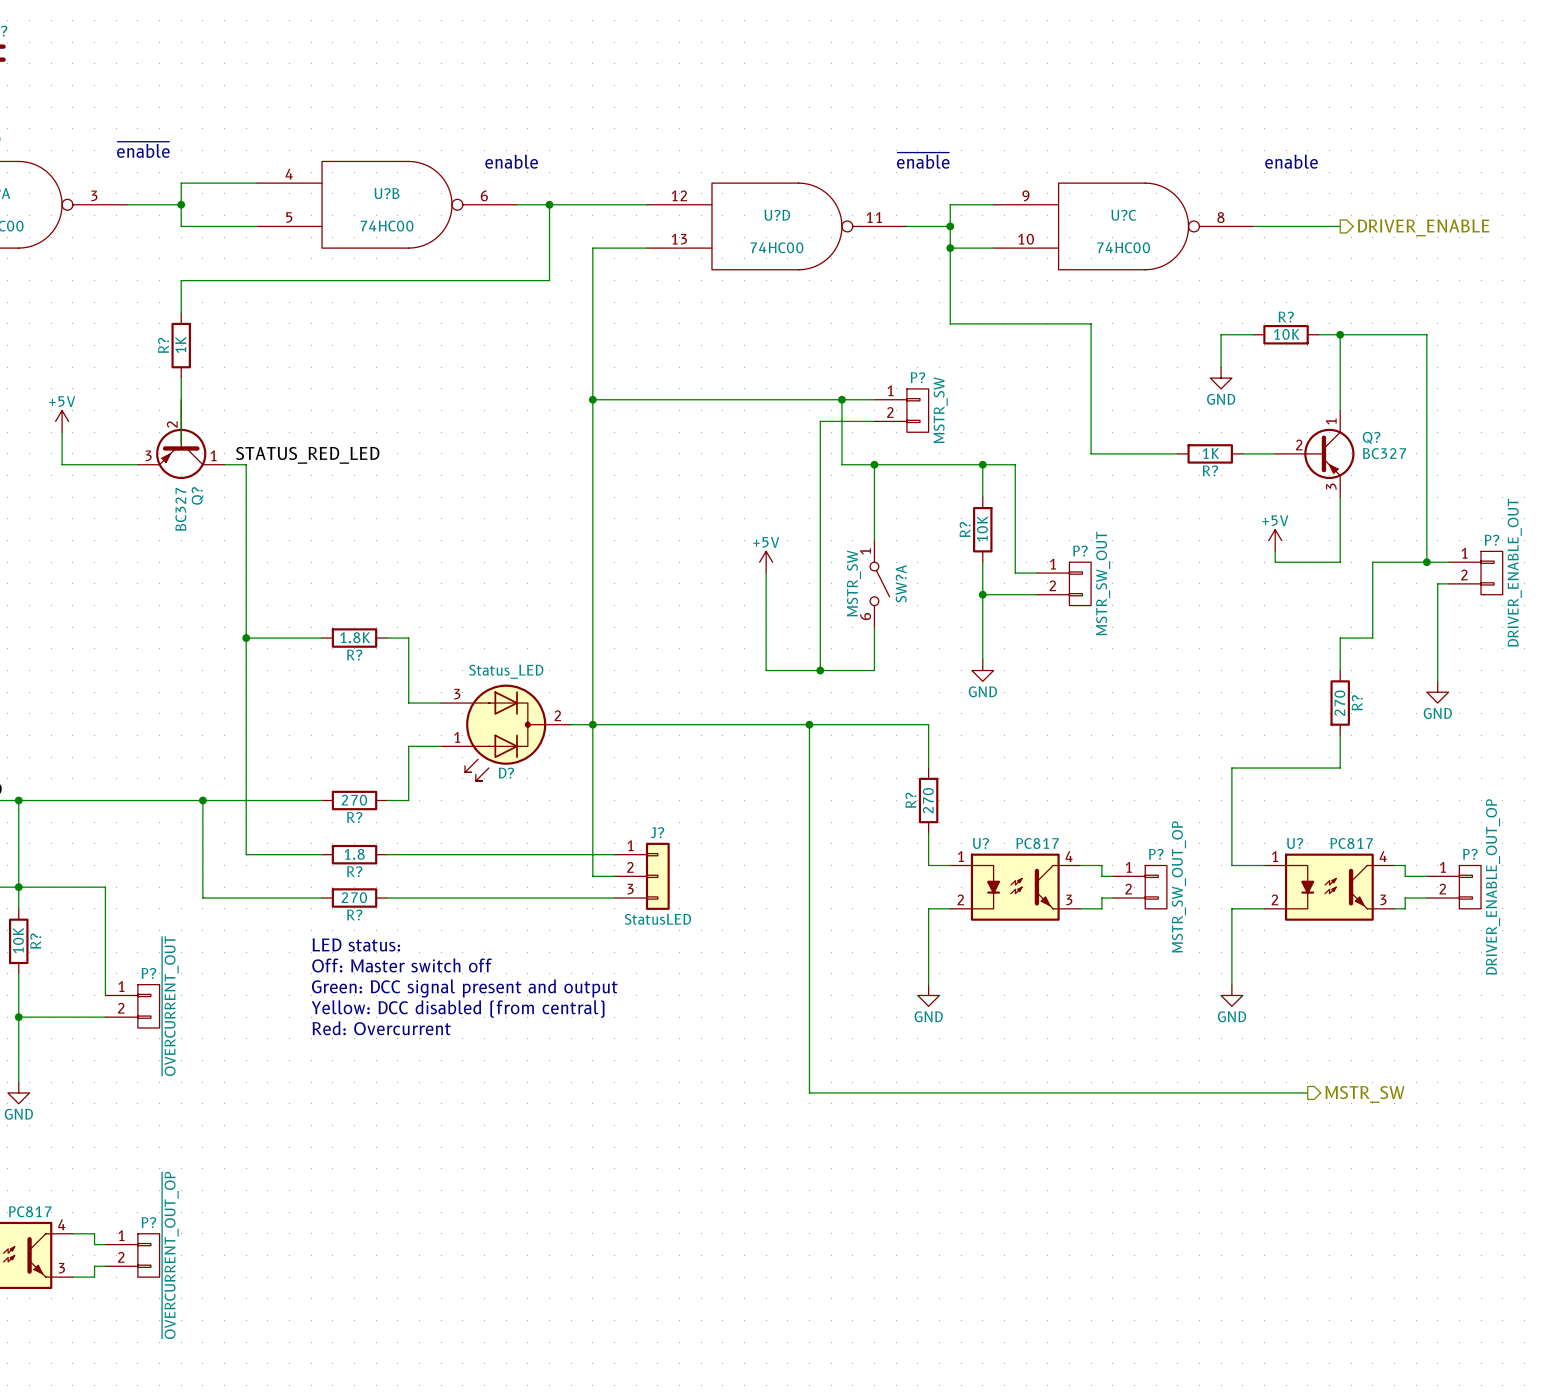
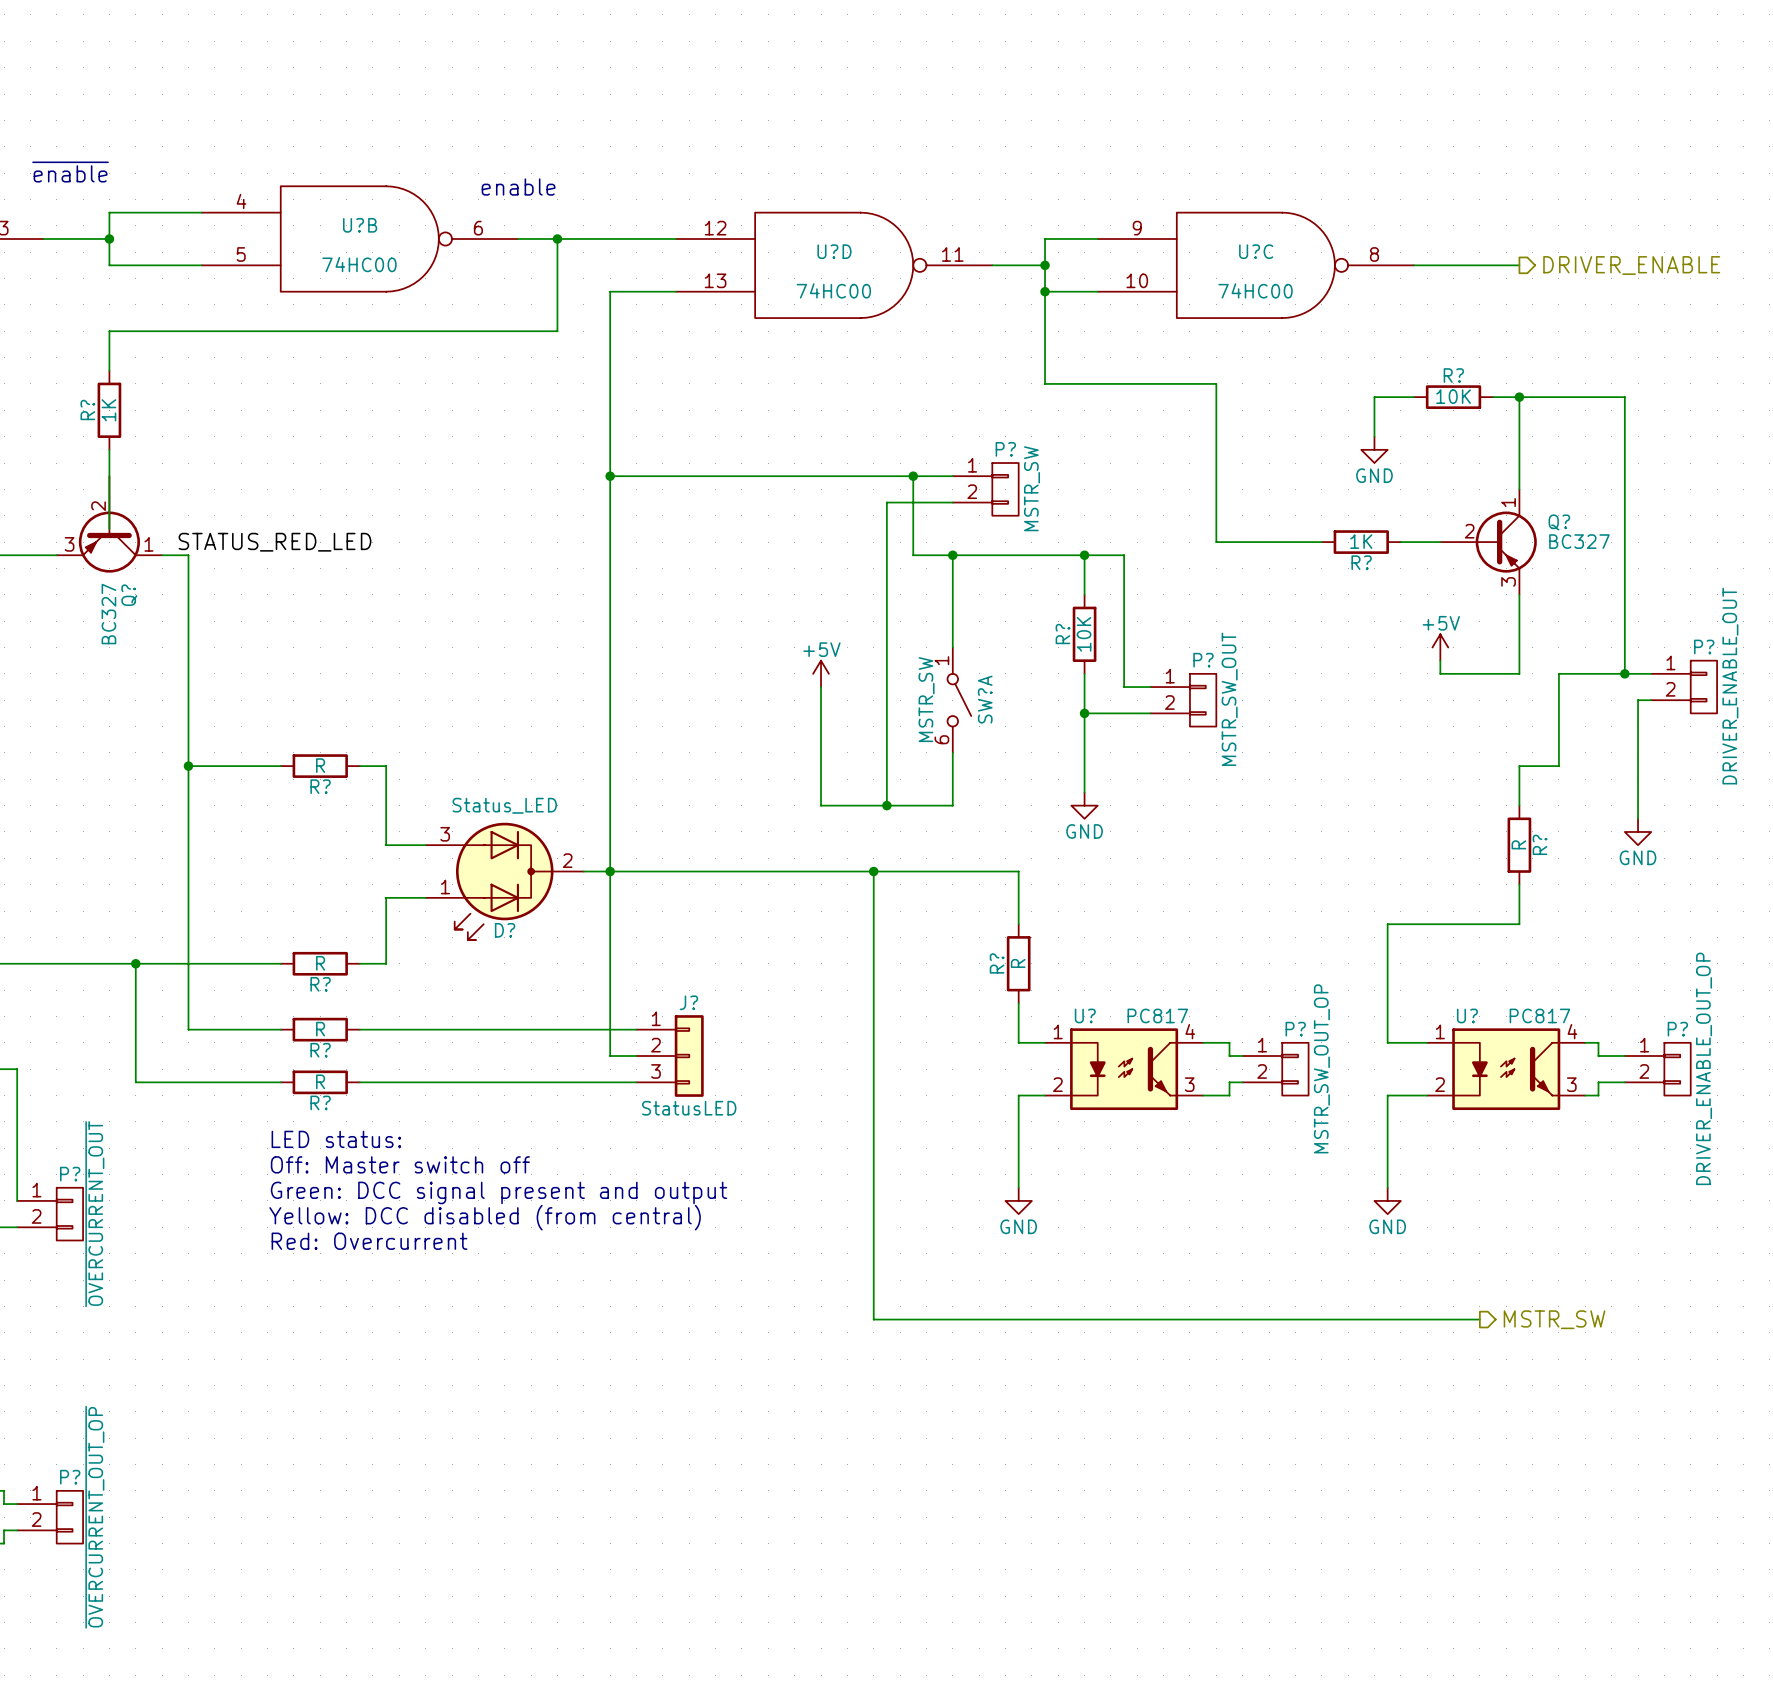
text: ~{enable} (923, 160) -> none
text: enable (1291, 161) -> none
R? value: 1.8K (355, 637) -> R (320, 765)
R? value: 270 (1339, 703) -> R (1518, 844)
R? value: 270 (354, 800) -> R (320, 963)
R? value: 270 (928, 800) -> R (1018, 963)
R? value: 1.8 (354, 854) -> R (320, 1029)
R? value: 270 (354, 897) -> R (320, 1081)

